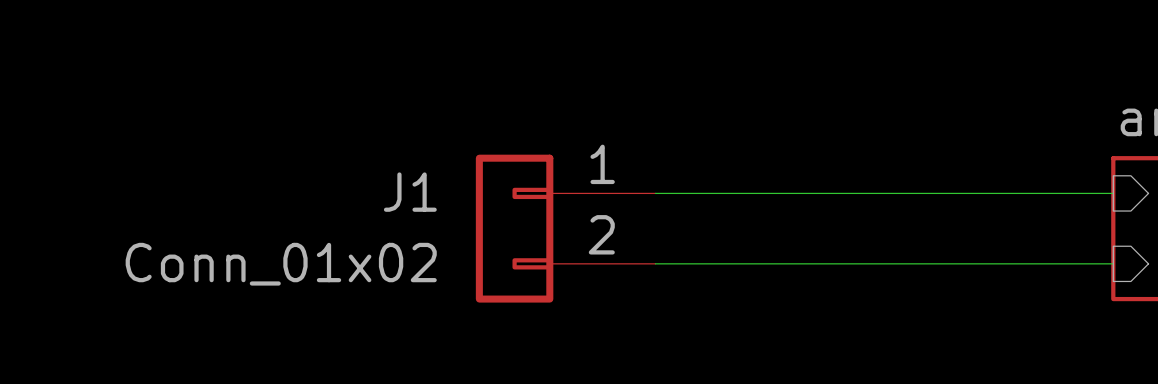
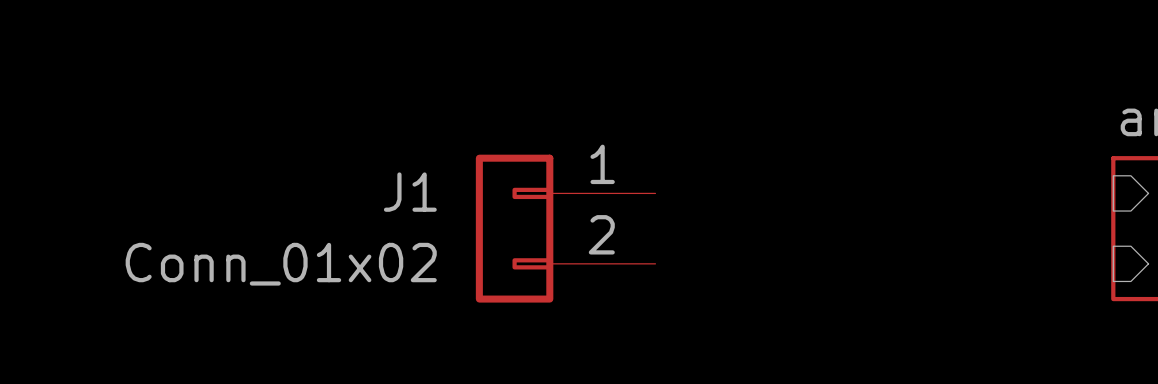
wire: (655, 193) (1113, 193) -> none
wire: (655, 263) (1113, 263) -> none

